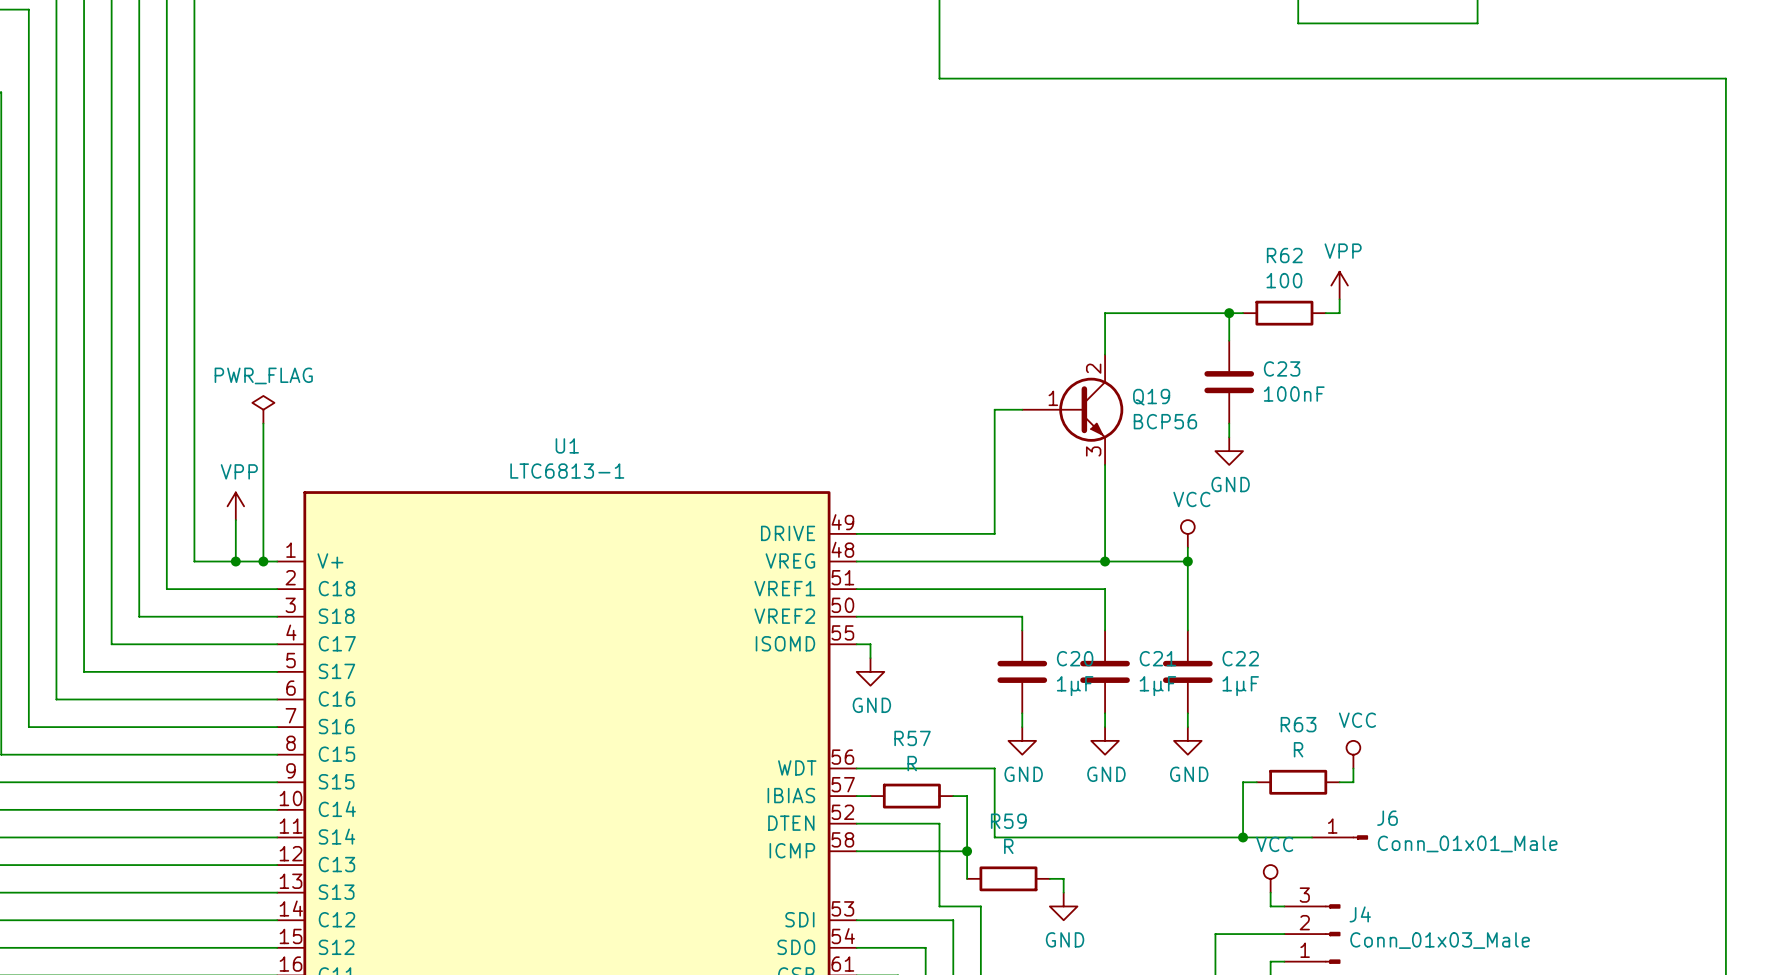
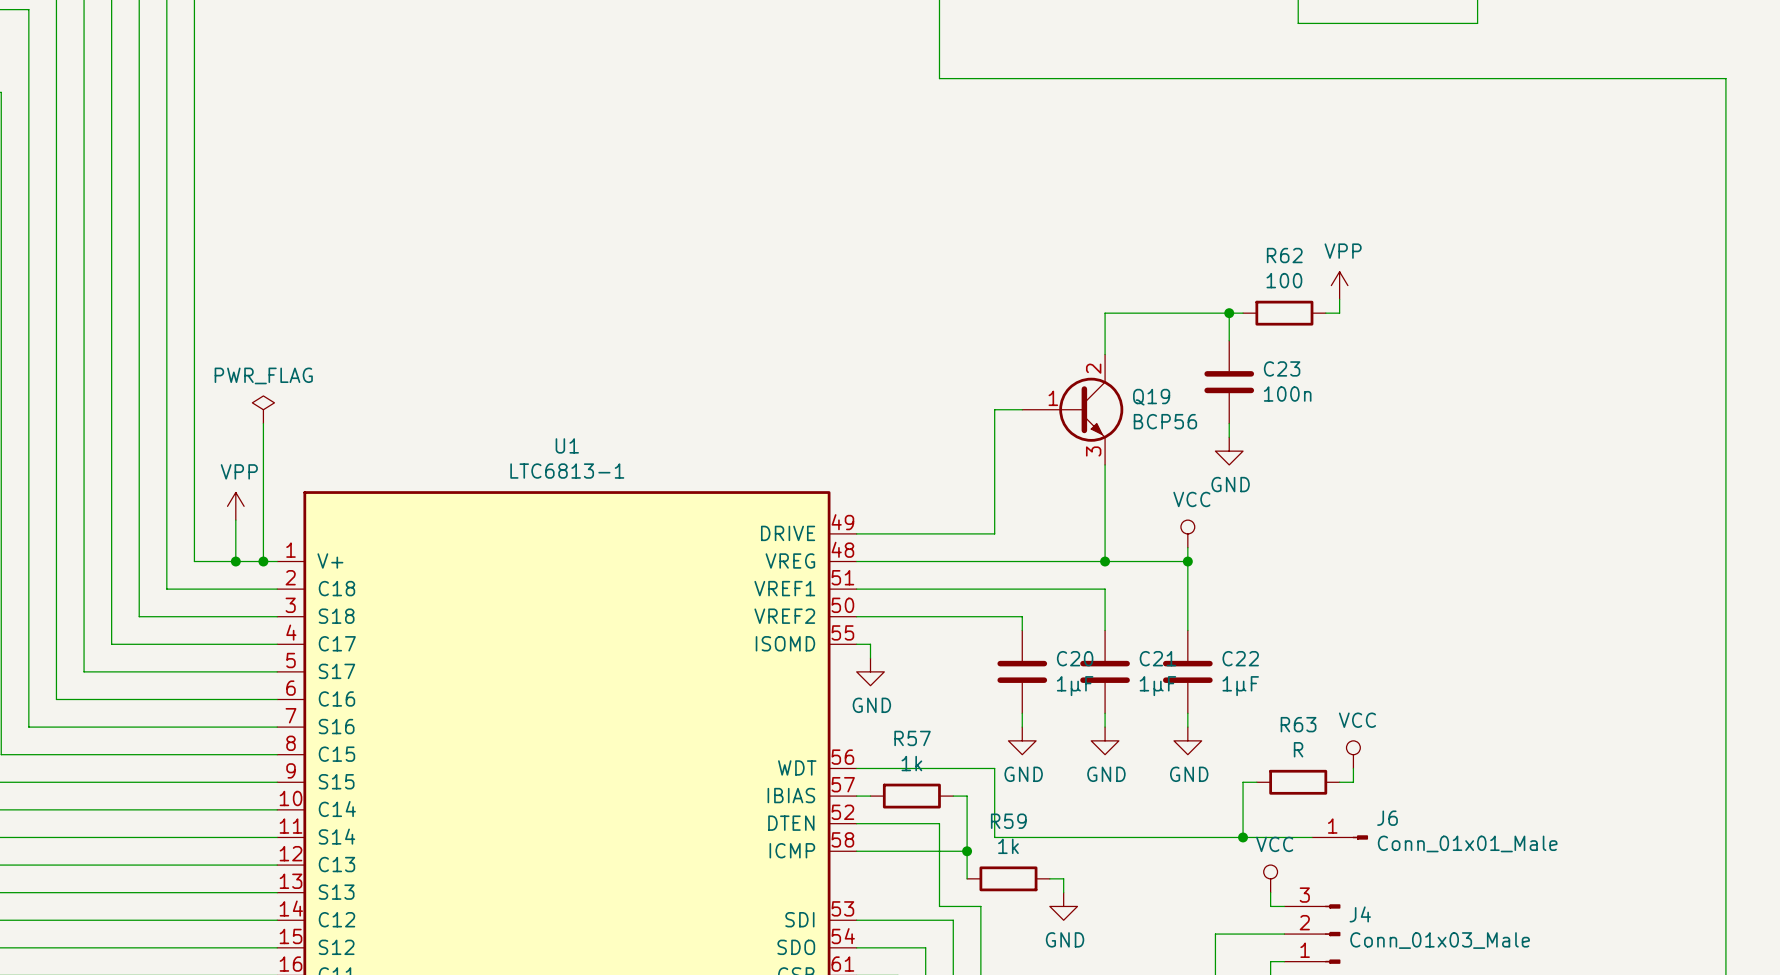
C23 value: 100nF (1294, 394) -> 100n (1287, 394)
R57 value: R (912, 763) -> 1k (911, 763)
R59 value: R (1008, 846) -> 1k (1008, 846)

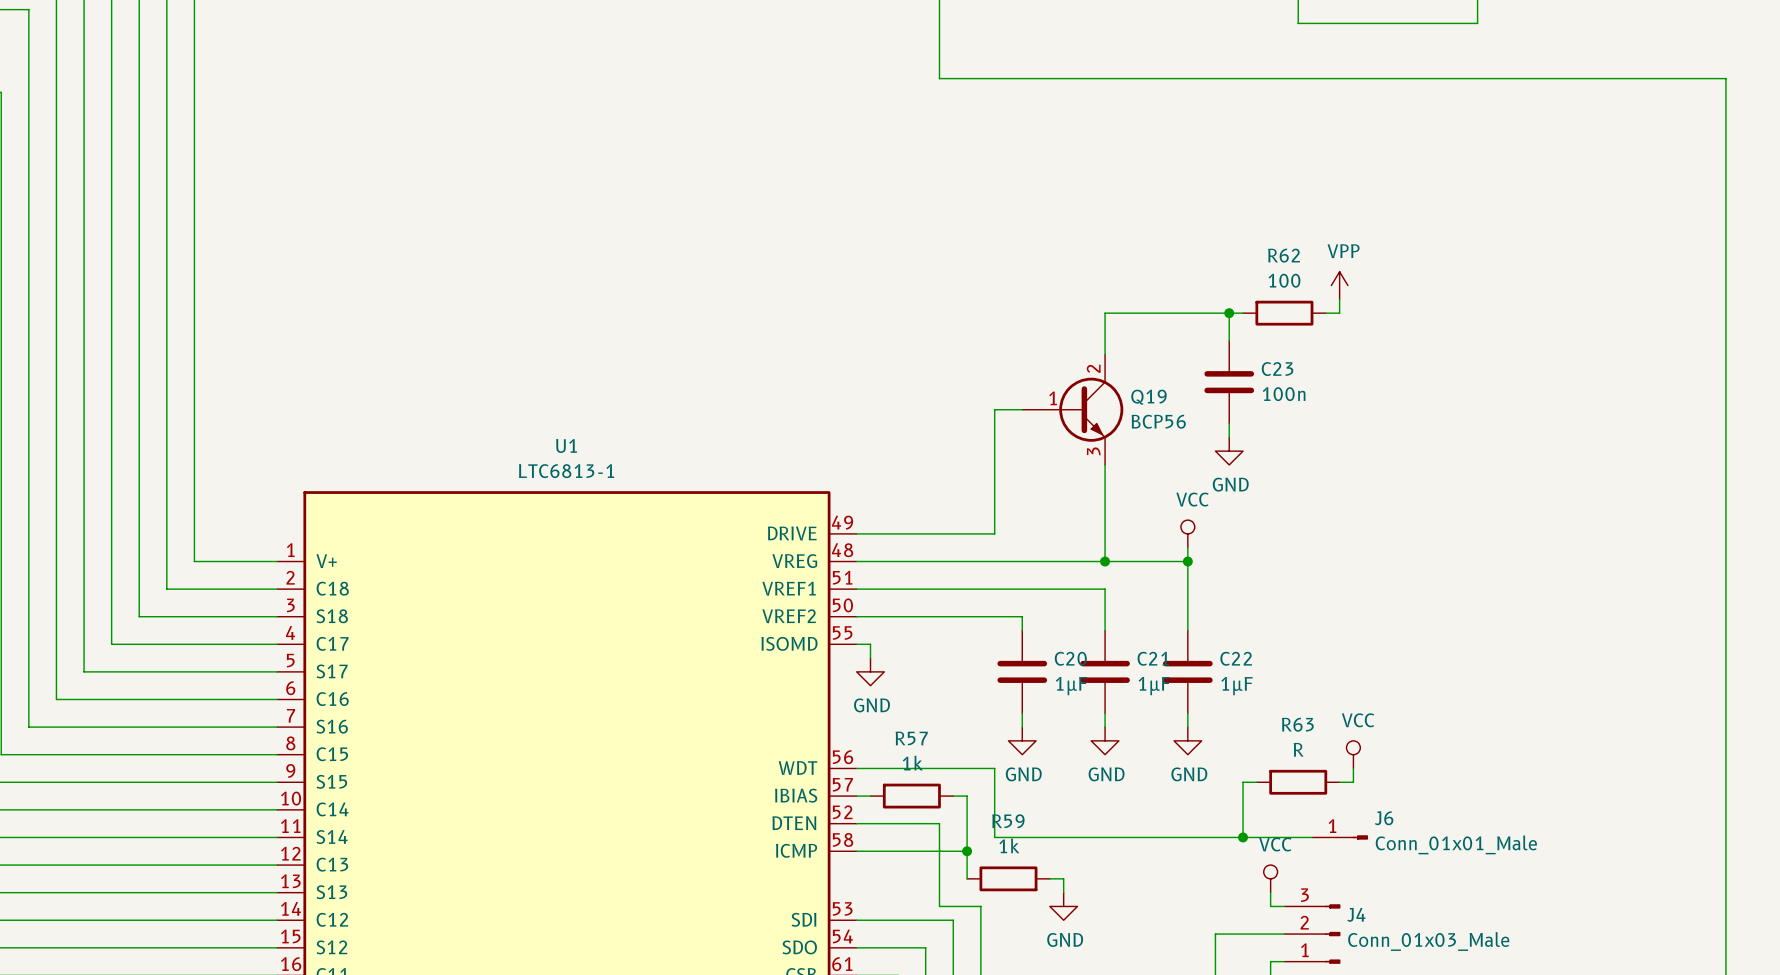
power symbol: PWR_FLAG (263, 409) -> none
wire: (263, 423) (263, 561) -> none
power symbol: VPP (235, 506) -> none
wire: (235, 520) (235, 561) -> none
junction: (235, 561) -> none
junction: (263, 561) -> none

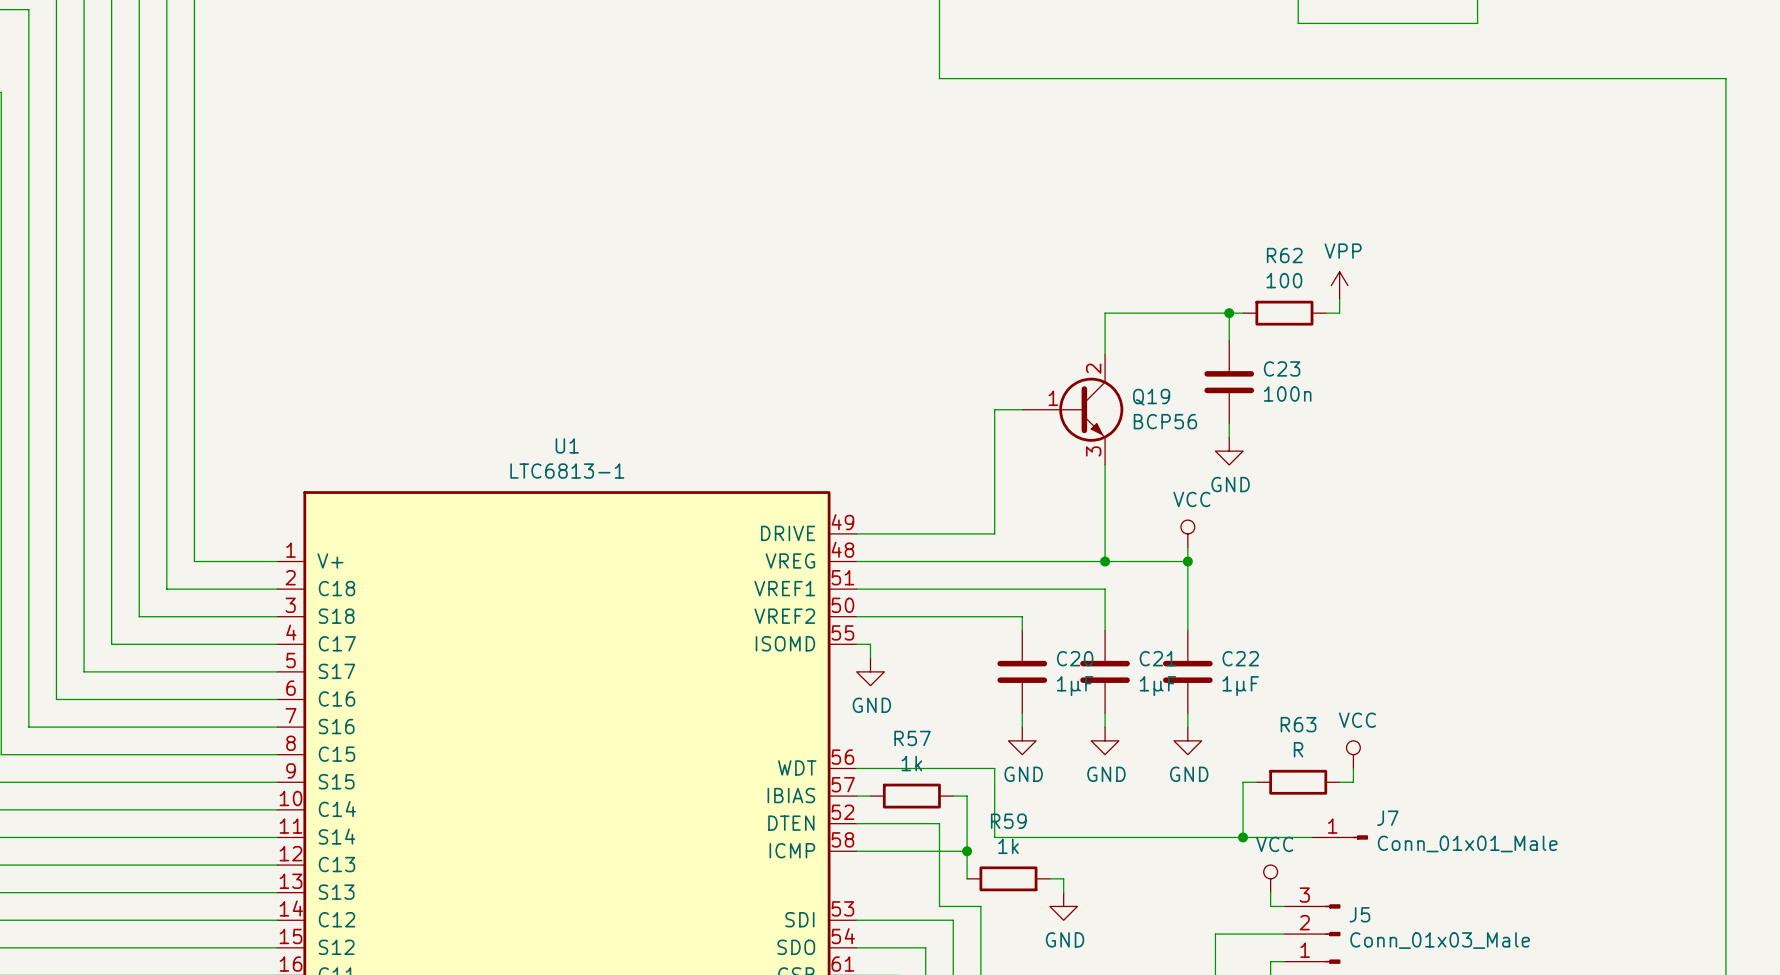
J6 name: J6 (1384, 818) -> J7 (1387, 818)
J4 name: J4 (1356, 914) -> J5 (1359, 914)

